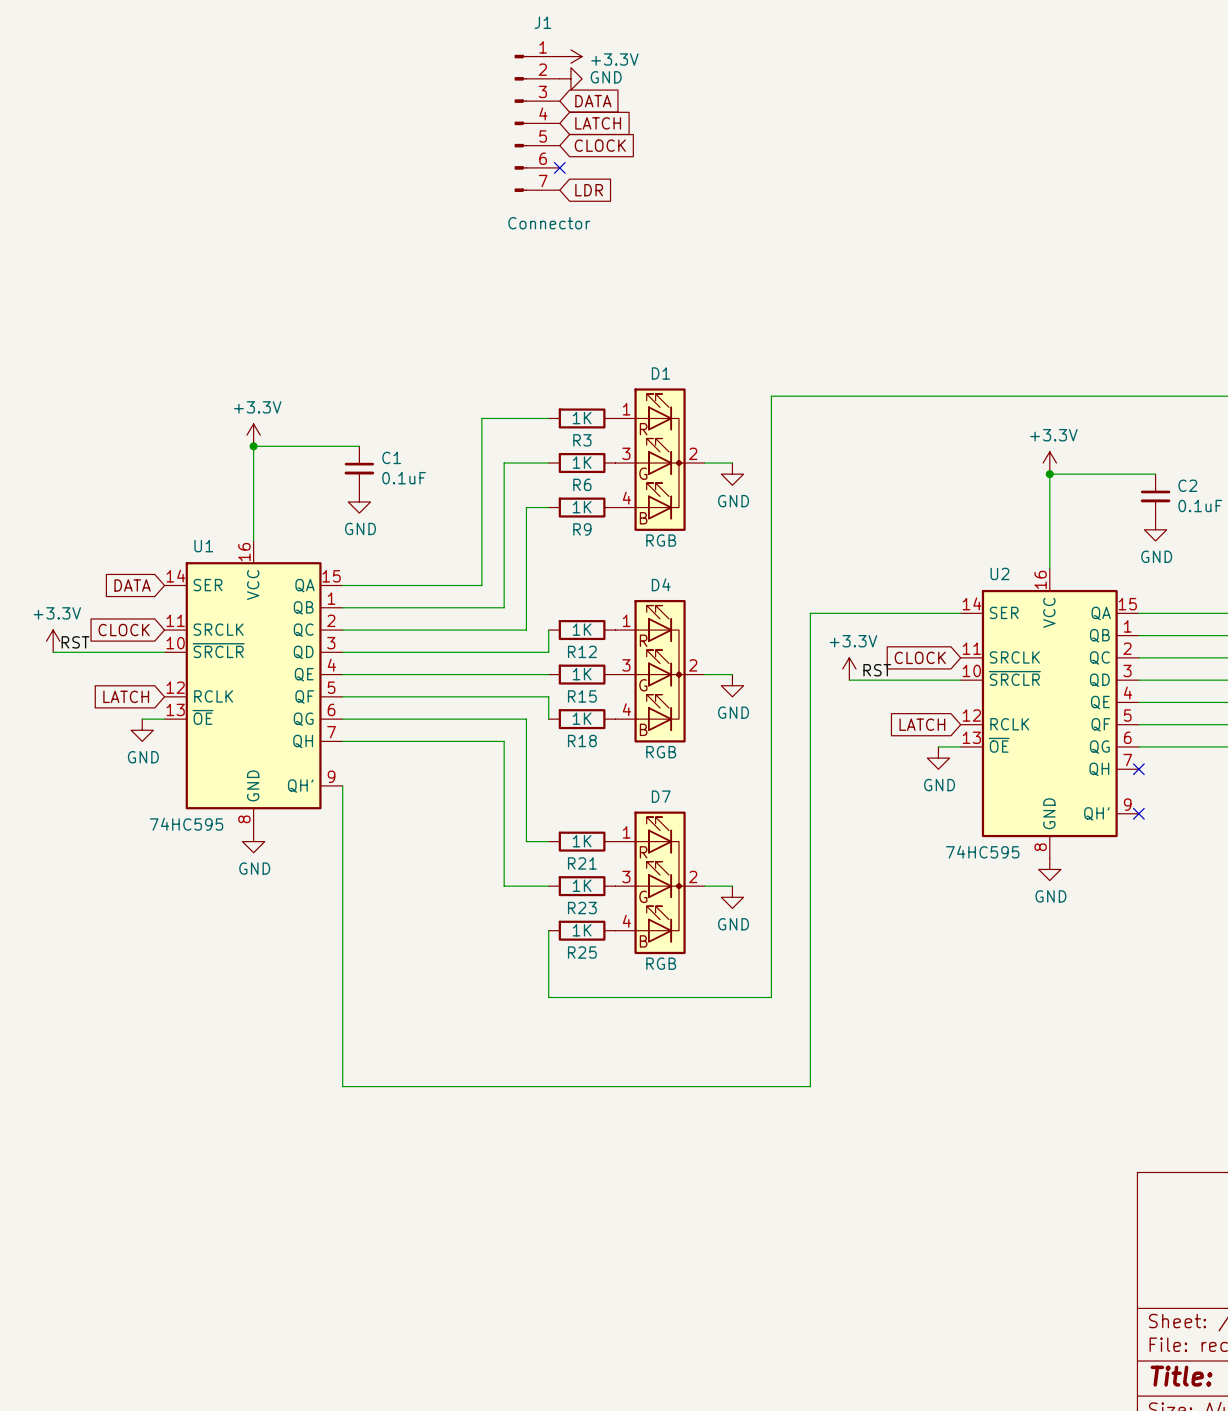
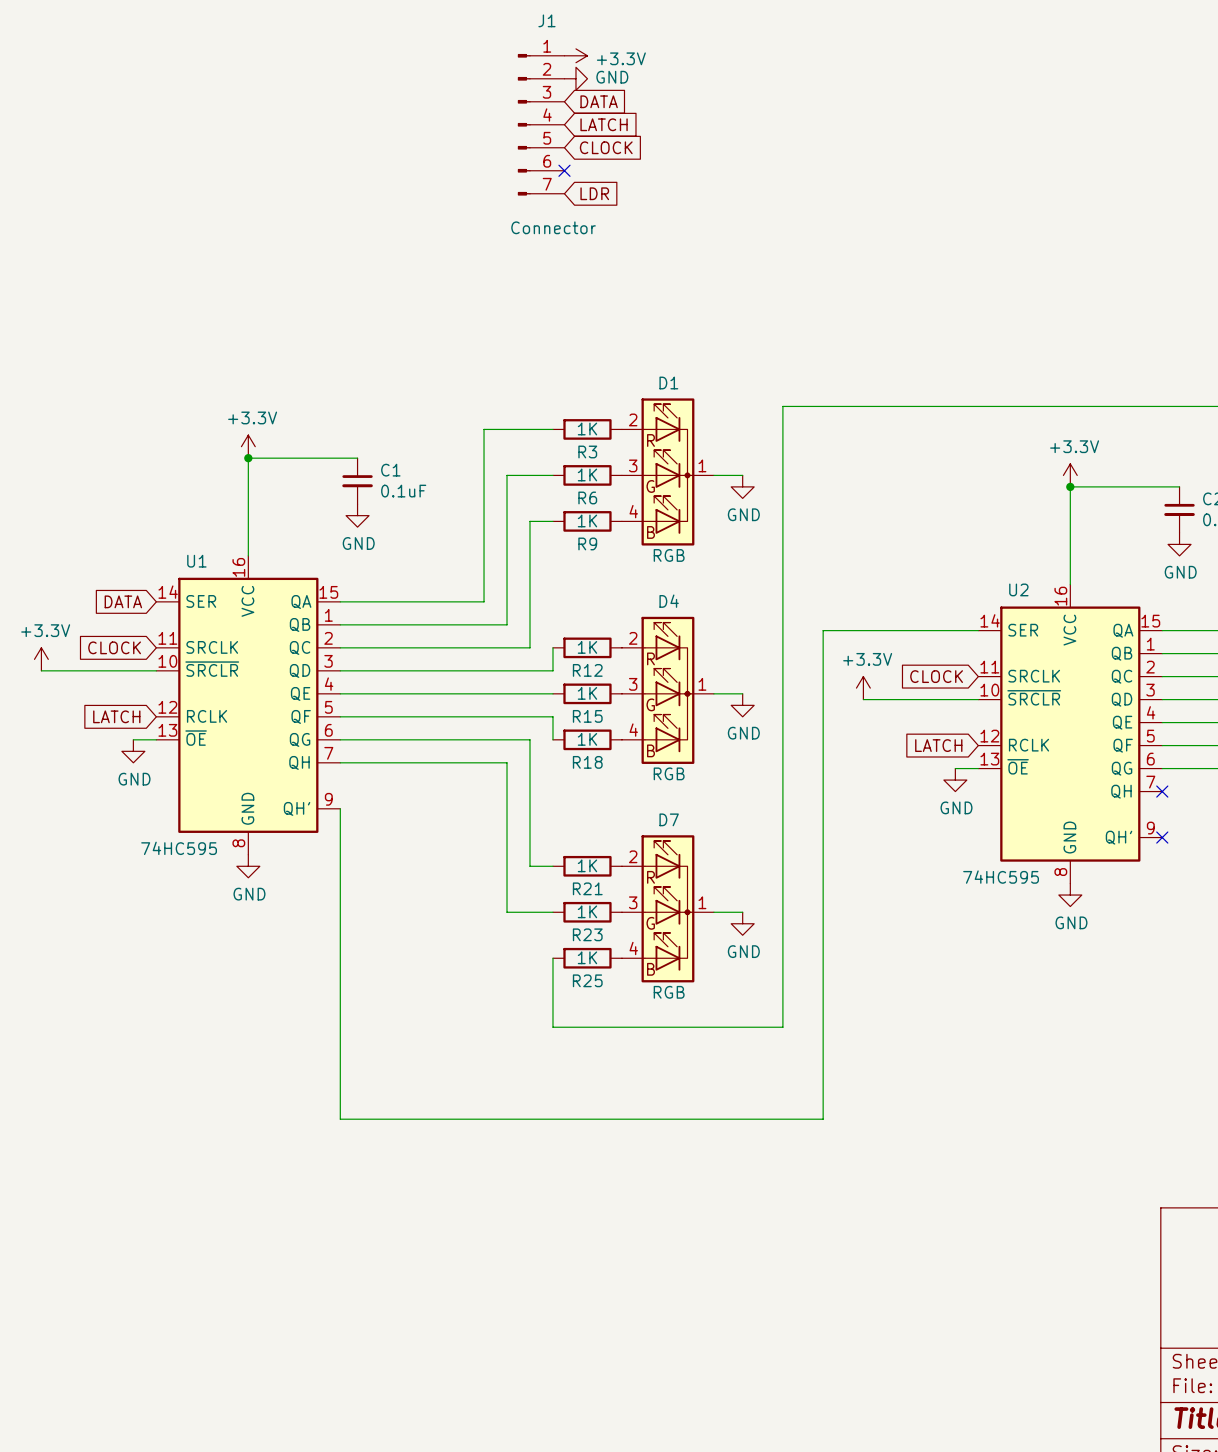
D1 symbol: [615, 388, 705, 531] -> [621, 398, 714, 546]
D4 symbol: [615, 599, 705, 743] -> [621, 616, 714, 764]
label: RST (75, 642) -> none
label: RST (877, 670) -> none
D7 symbol: [615, 811, 705, 955] -> [621, 835, 714, 983]

